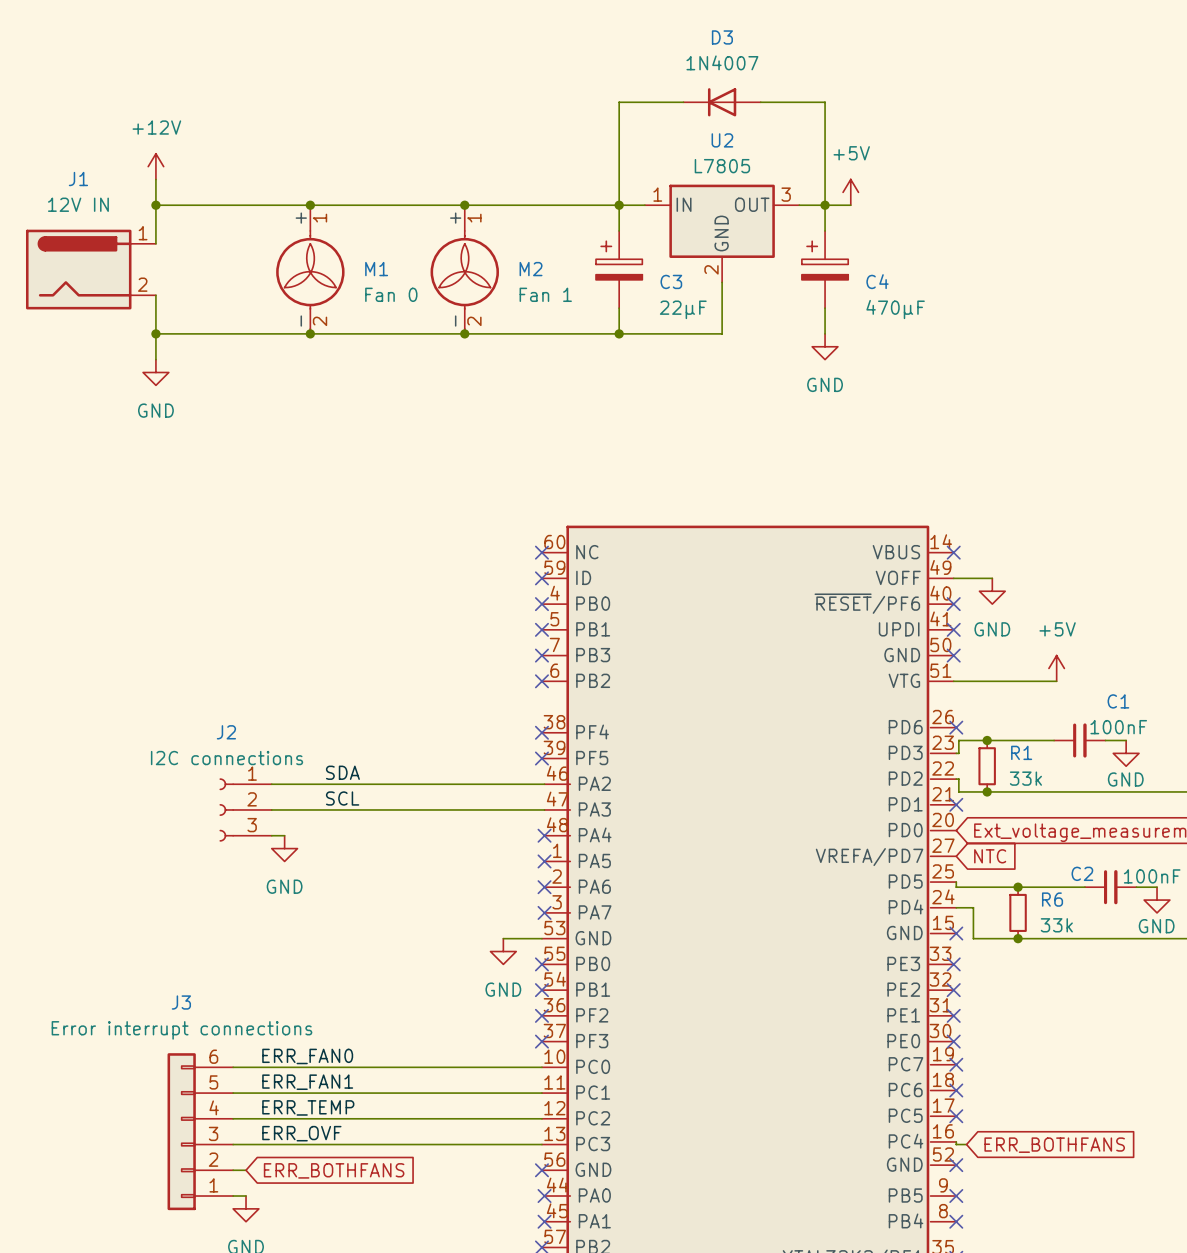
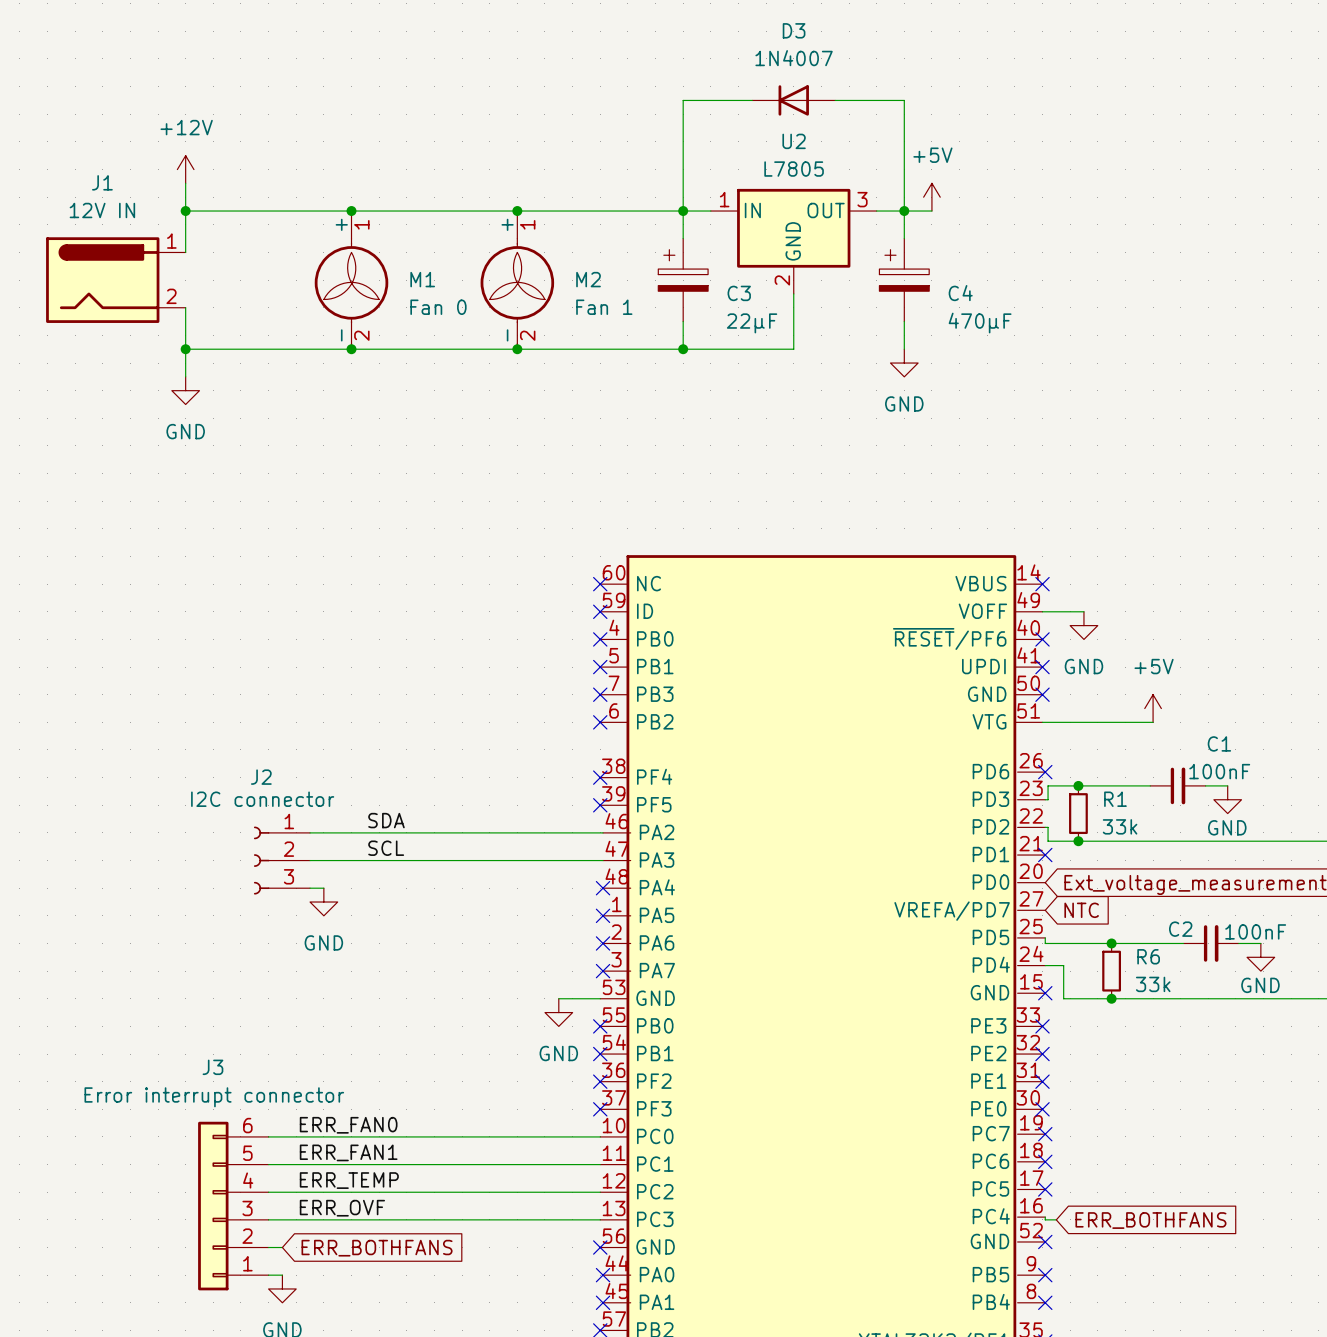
J2 value: I2C connections (227, 758) -> I2C connector (262, 799)
J3 value: Error interrupt connections (181, 1030) -> Error interrupt connector (214, 1097)

